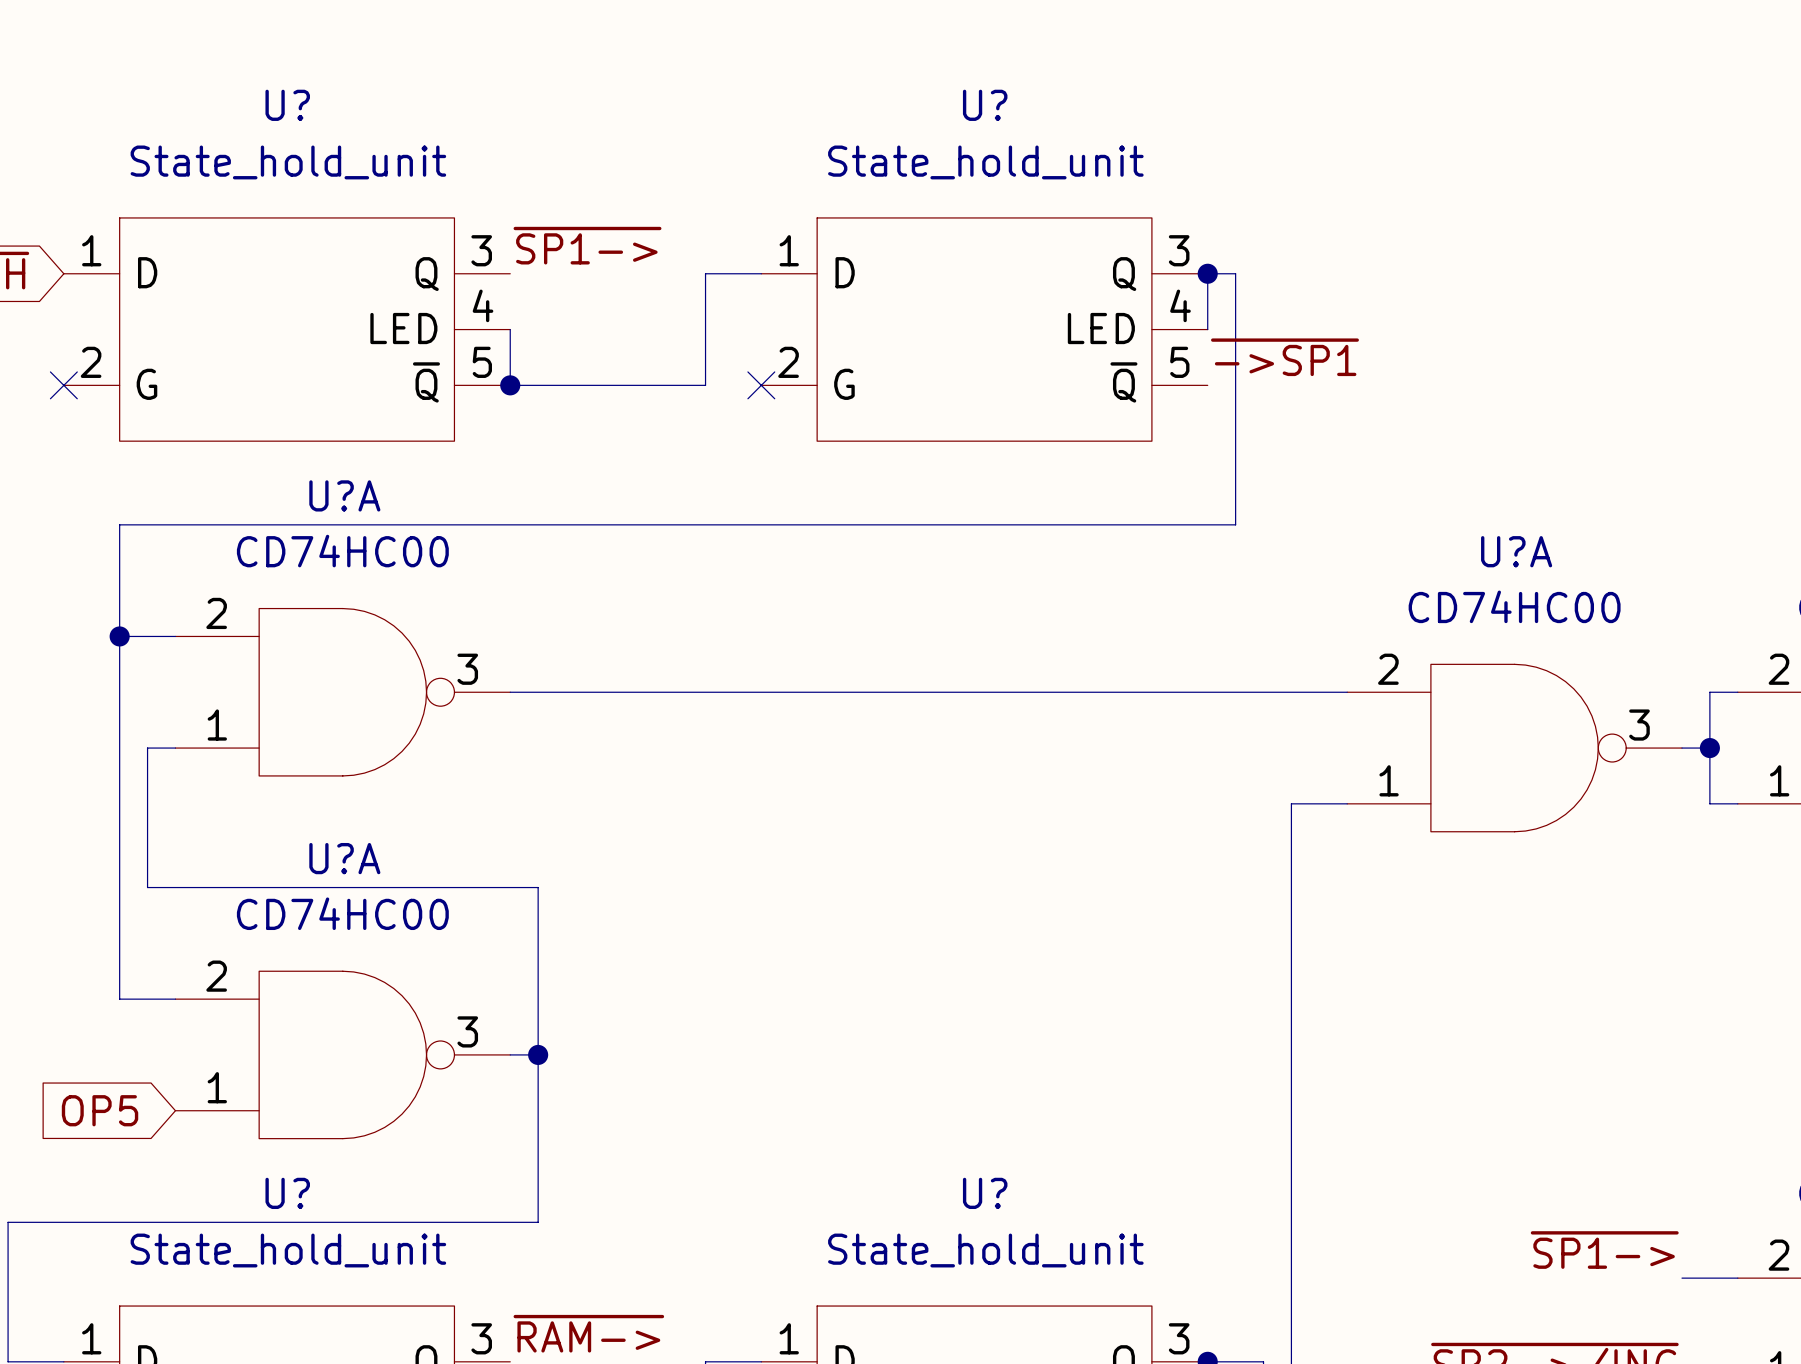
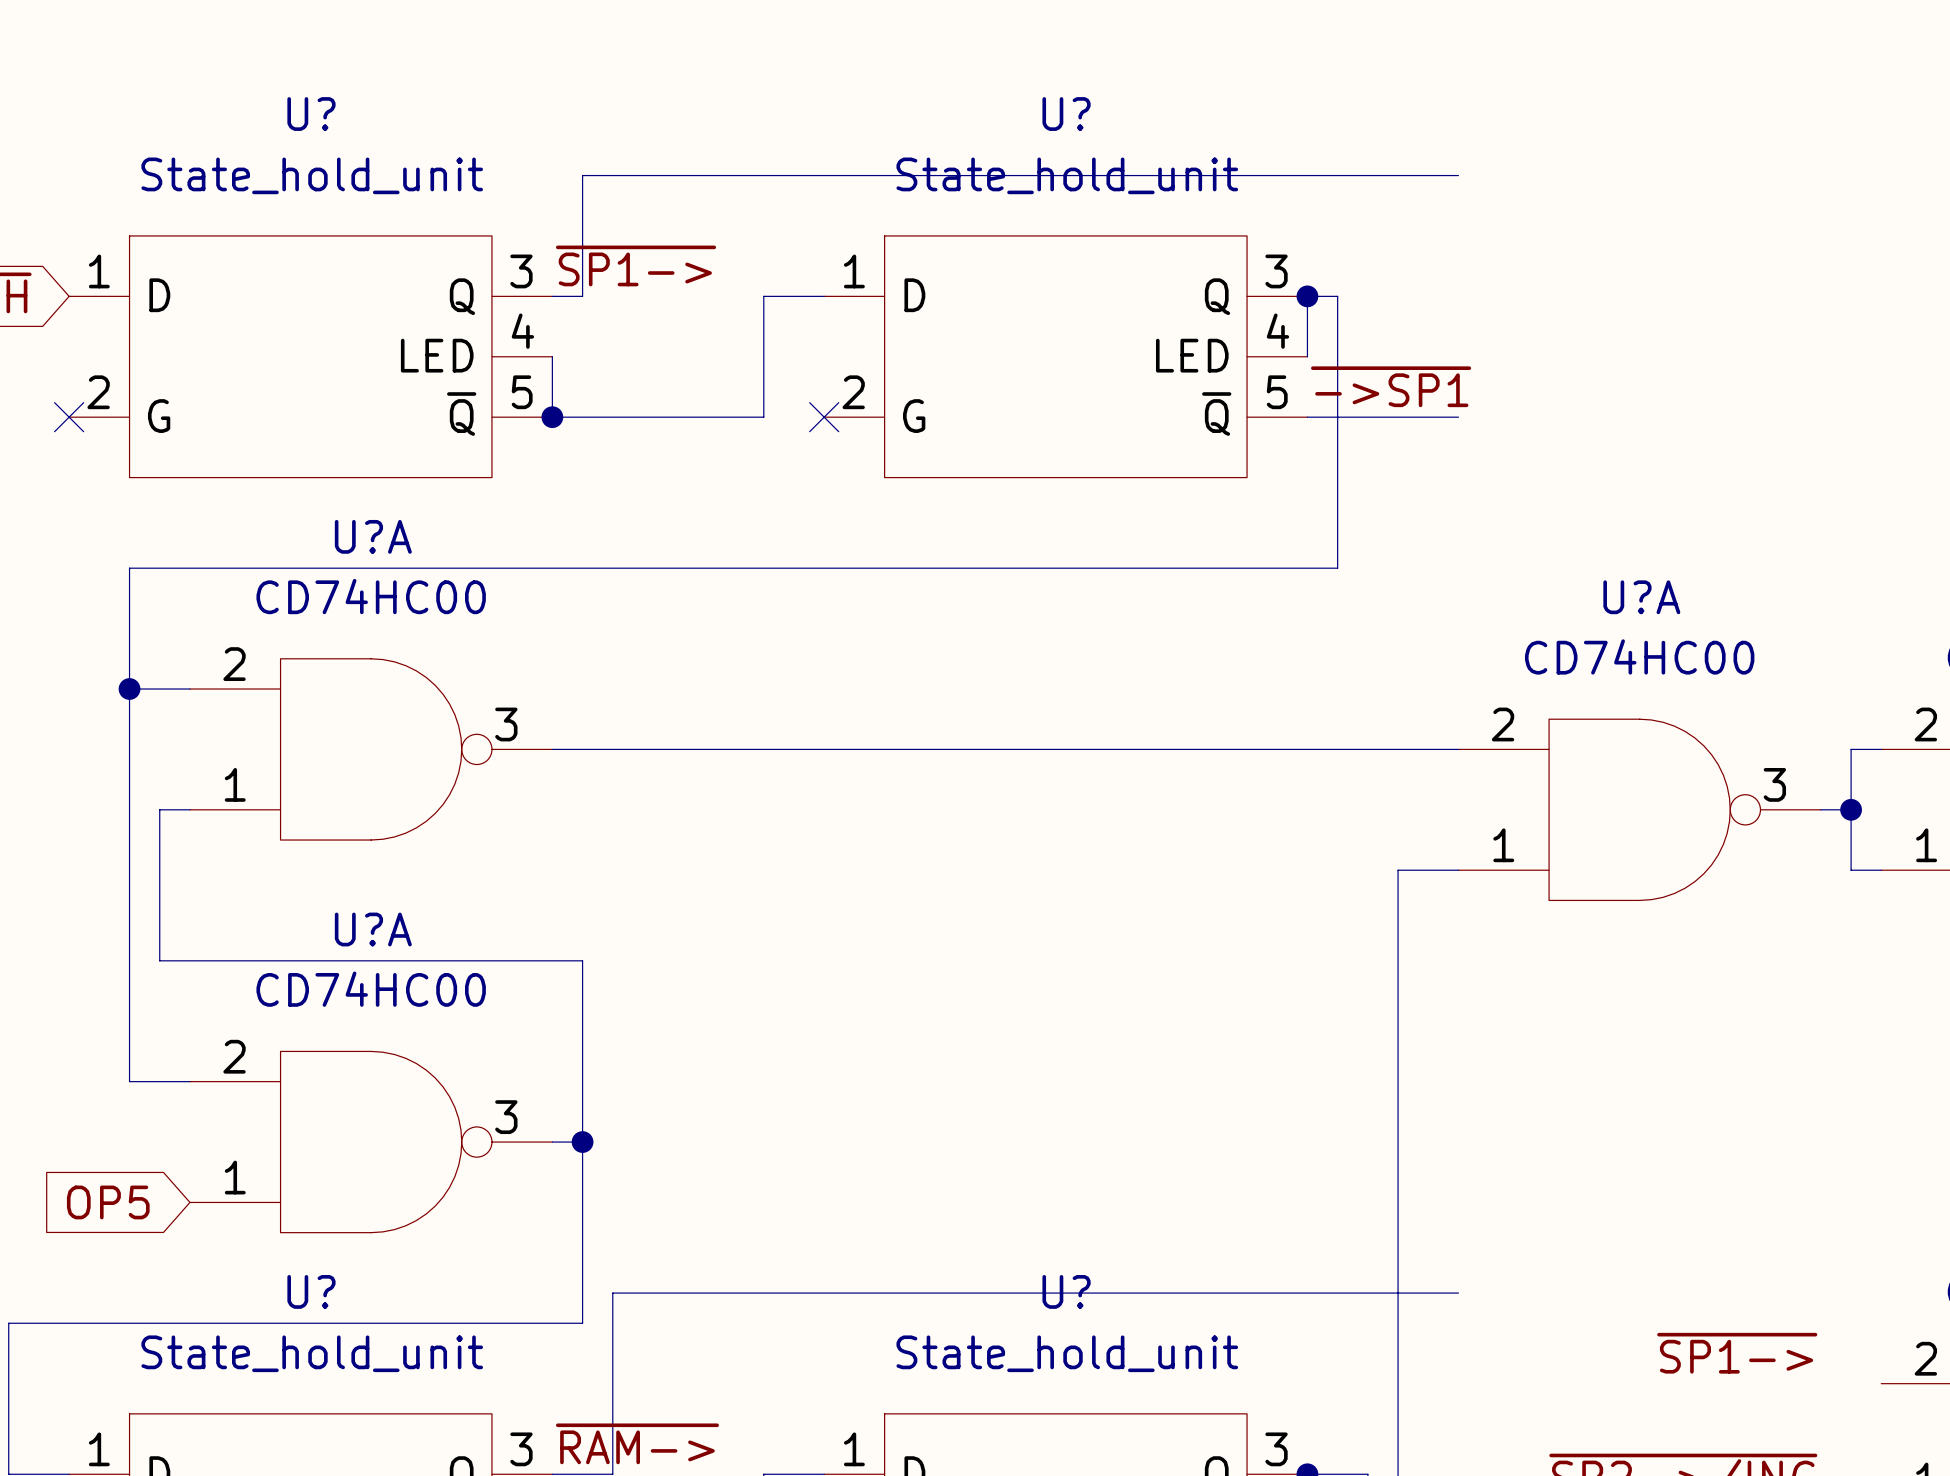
wire: none -> (1458, 175) (582, 175) (582, 296) (552, 296)
wire: none -> (1307, 417) (1458, 417)
wire: none -> (1458, 1293) (612, 1293) (612, 1474) (552, 1474)
wire: (1682, 1278) (1737, 1278) -> none

